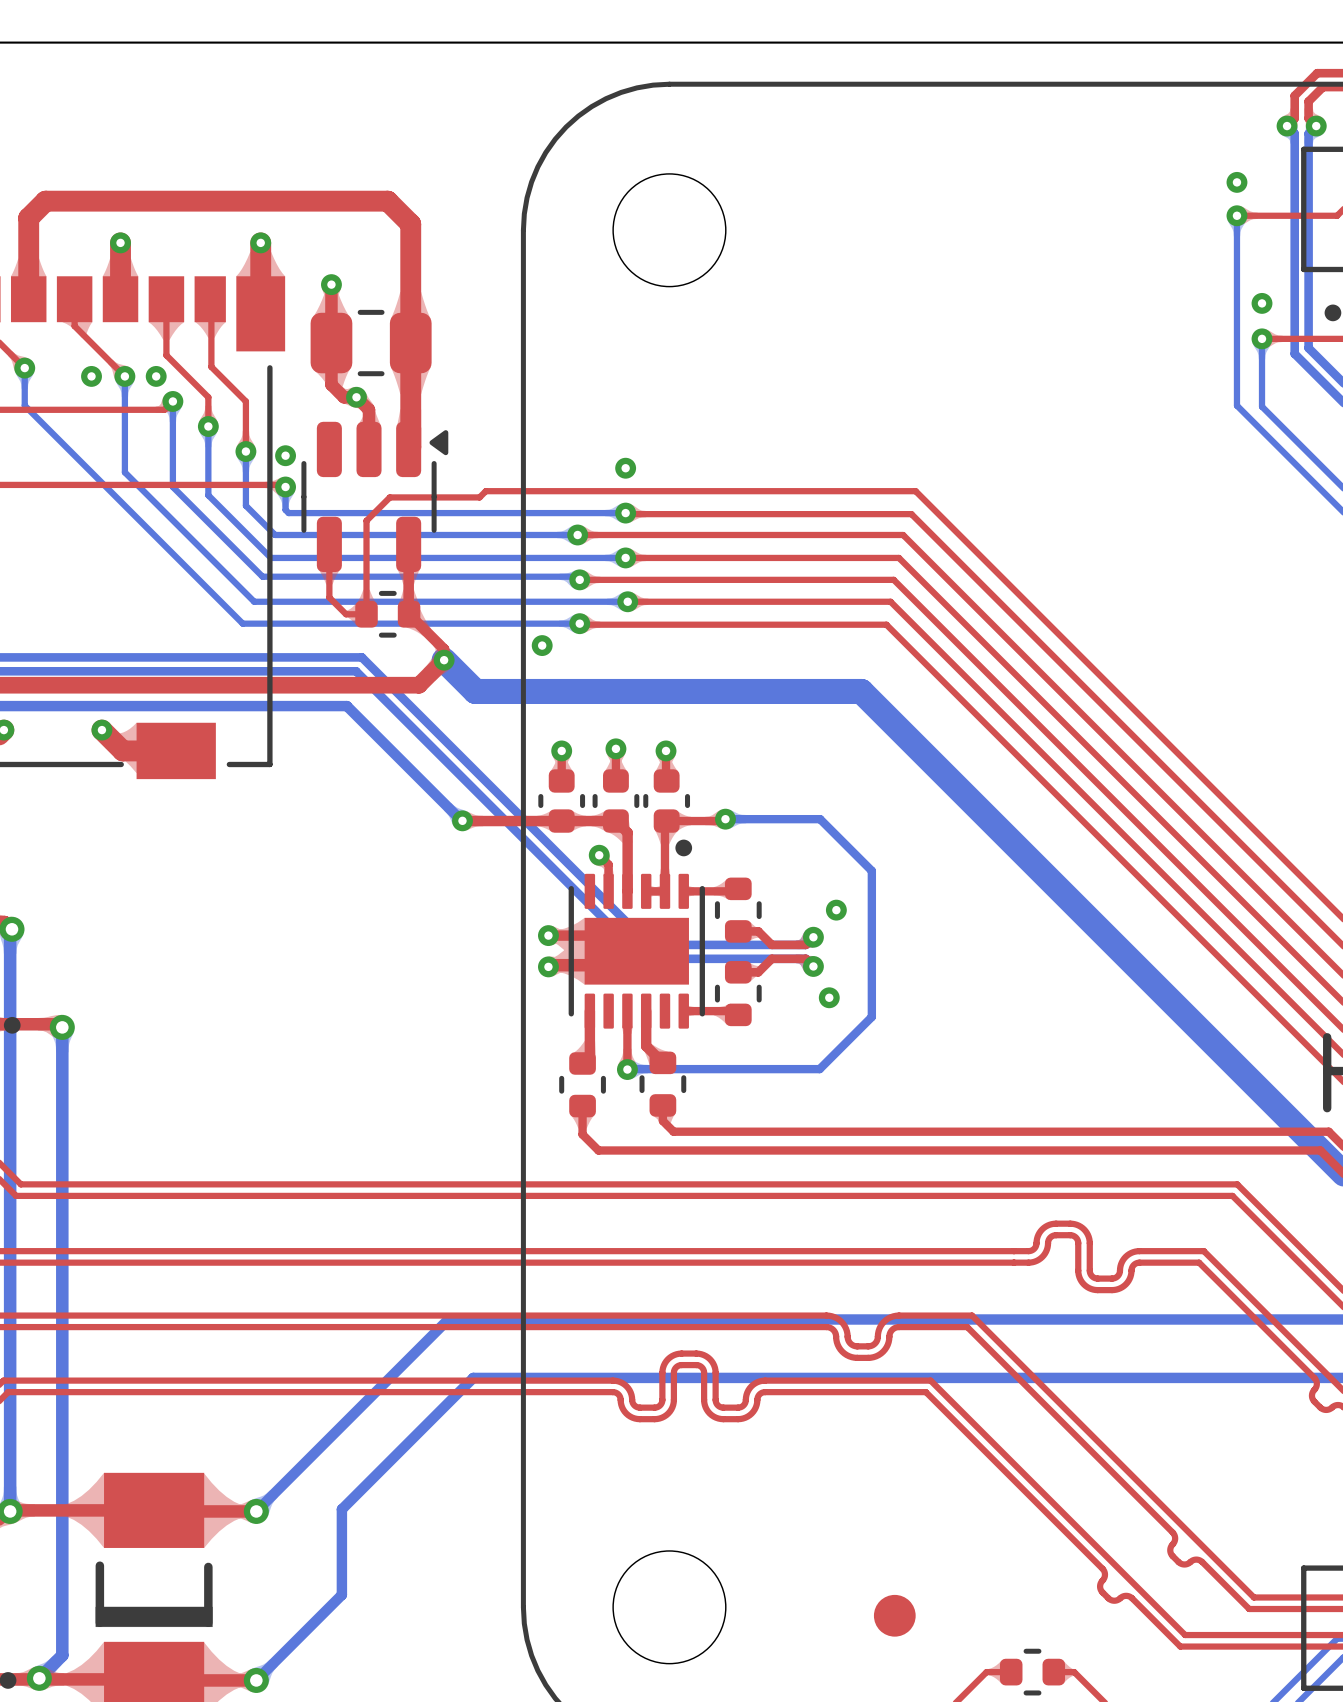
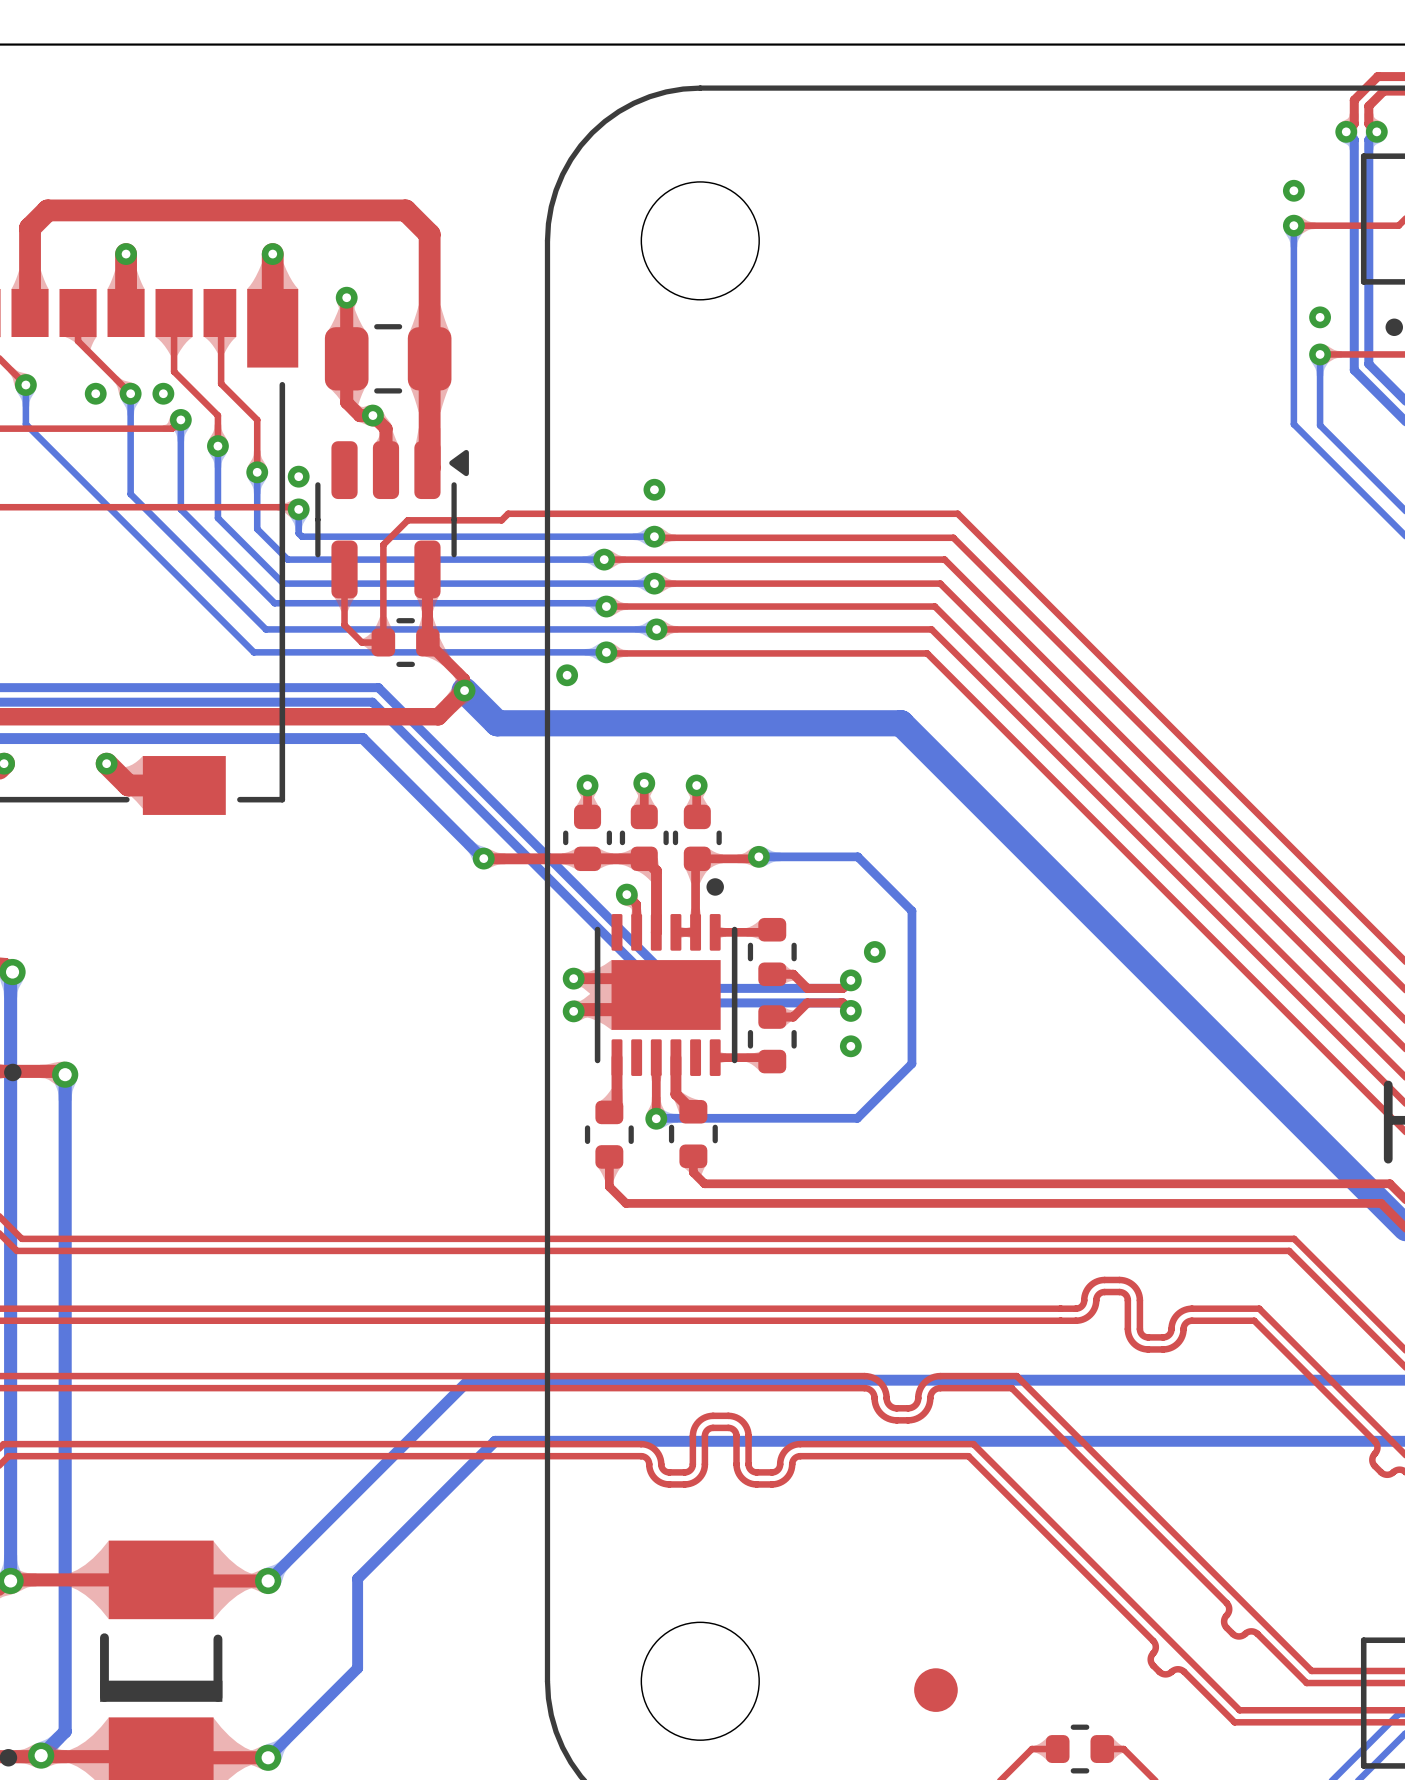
via position: (829, 997) -> (850, 1046)

